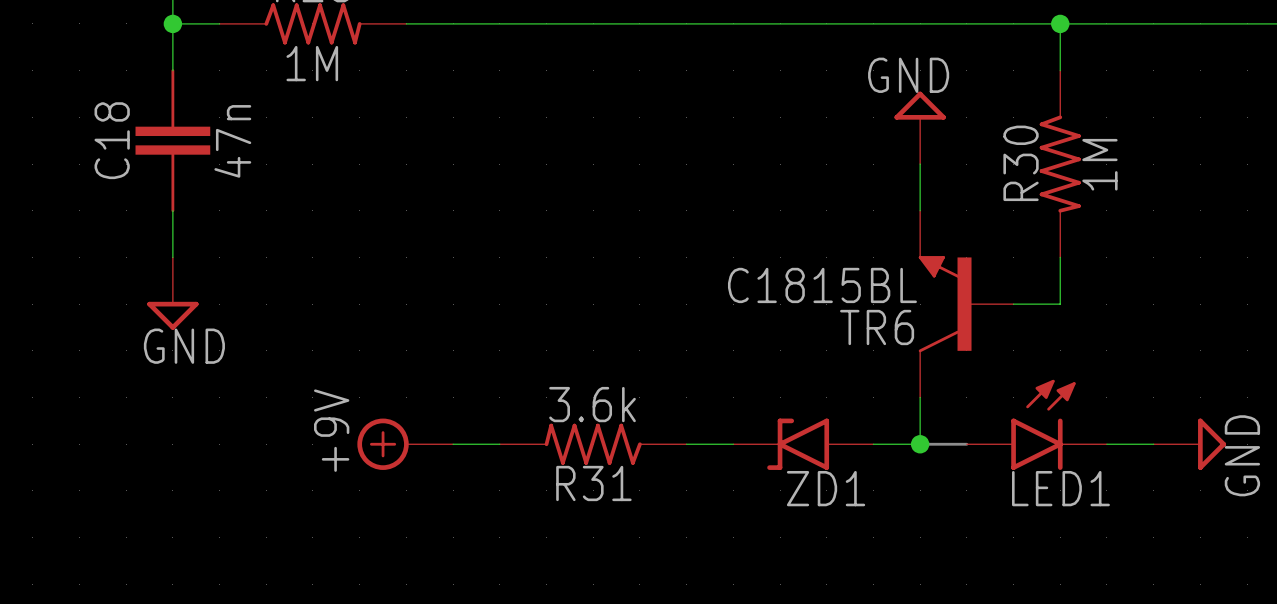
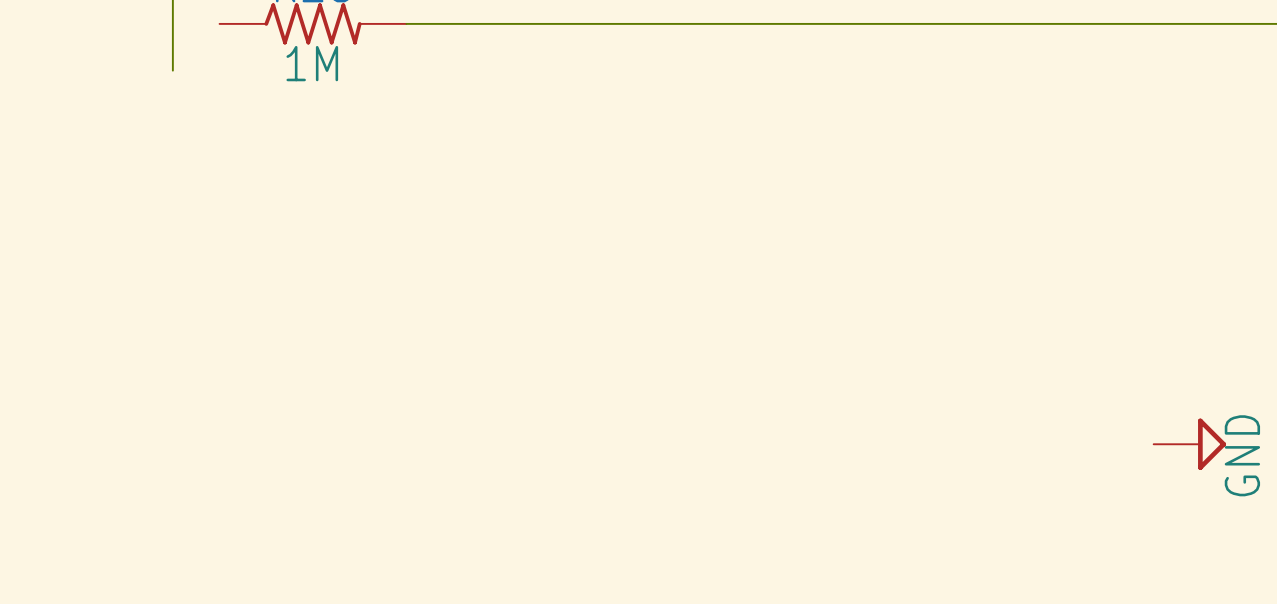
wire: (172, 23) (219, 23) -> none
junction: (172, 23) -> none
wire: (1060, 23) (1060, 70) -> none
junction: (1060, 23) -> none
power symbol: GND (920, 127) -> none
C18: 47n (172, 140) -> none
wire: (920, 164) (920, 210) -> none
R30: 1M (1060, 164) -> none
wire: (172, 210) (172, 257) -> none
wire: (1060, 257) (1060, 304) (1013, 304) -> none
power symbol: GND (172, 293) -> none
TR6: C1815BL (966, 304) -> none
wire: (920, 397) (920, 444) (873, 444) -> none
LED1: (1036, 424) -> none
power symbol: +9V (405, 444) -> none
wire: (453, 444) (499, 444) -> none
R31: 3.6k (593, 444) -> none
wire: (686, 444) (733, 444) -> none
ZD1: (803, 444) -> none
line: (920, 444) (966, 444) -> none
junction: (920, 444) -> none
wire: (1106, 444) (1153, 444) -> none

